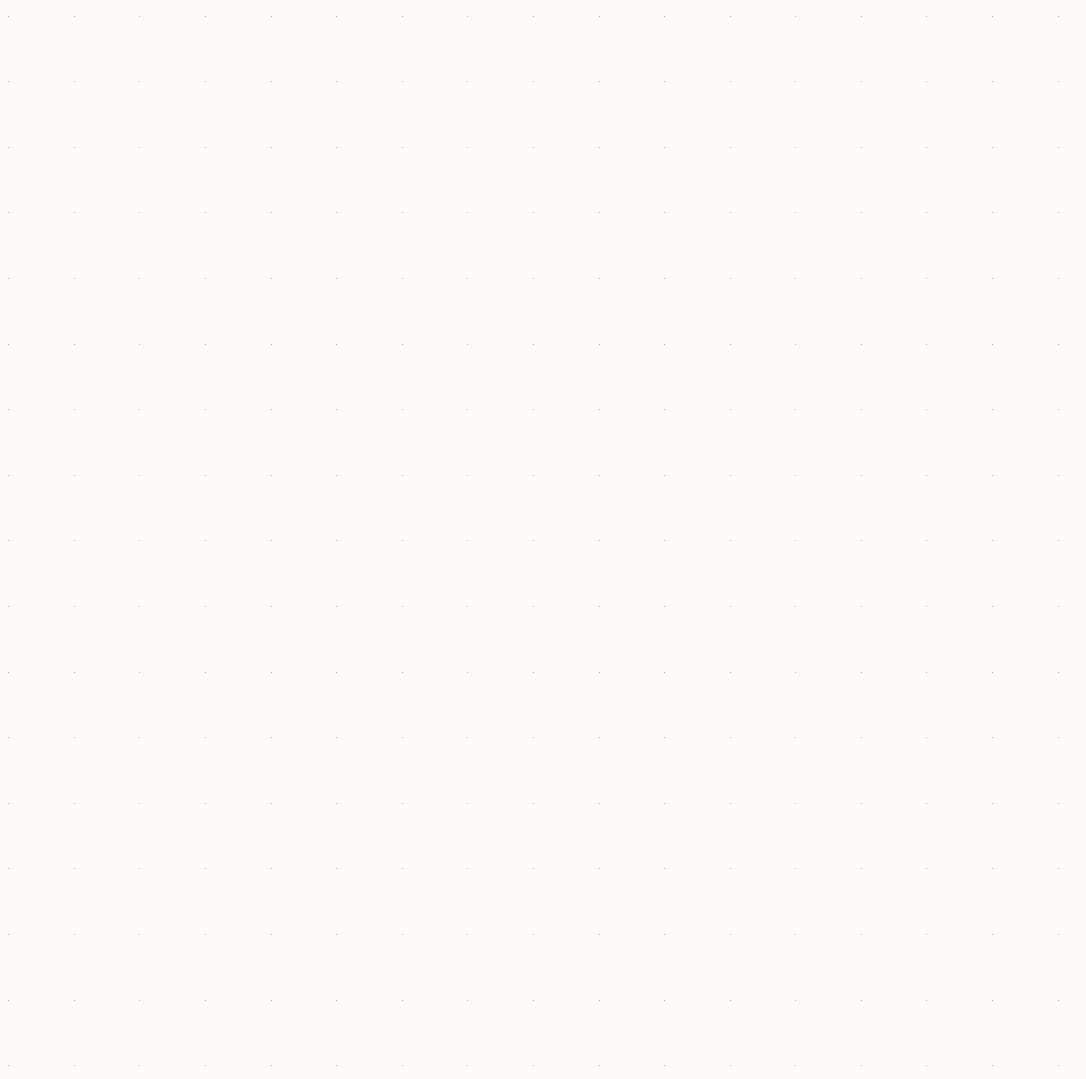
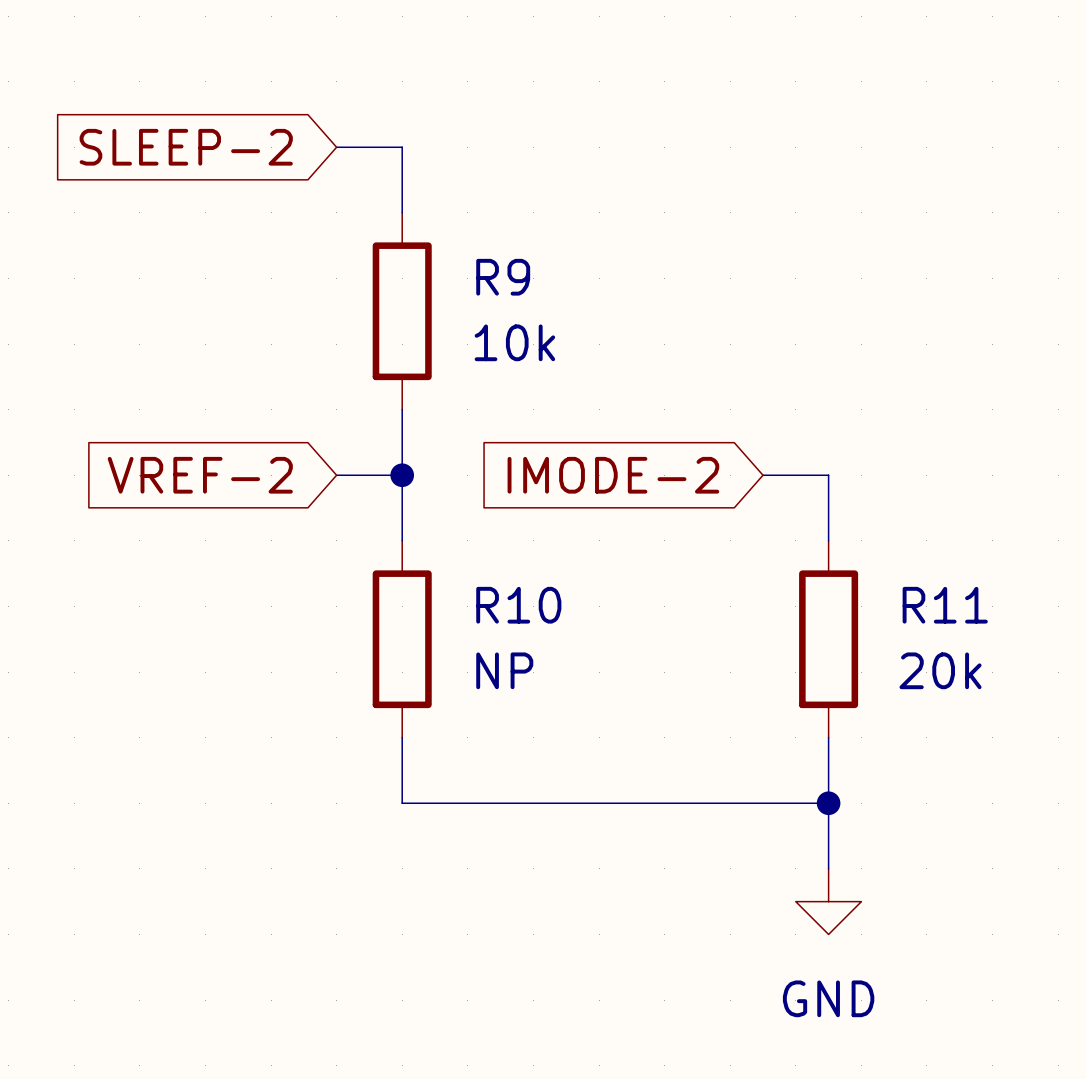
global label: none -> SLEEP-2 (186, 147)
wire: none -> (336, 147) (402, 147) (402, 212)
R9: none -> 10k (402, 311)
wire: none -> (402, 409) (402, 540)
global label: none -> VREF-2 (200, 475)
wire: none -> (336, 475) (402, 475)
junction: none -> (402, 475)
global label: none -> IMODE-2 (613, 475)
wire: none -> (763, 475) (828, 475) (828, 540)
R10: none -> NP (402, 639)
R11: none -> 20k (828, 639)
wire: none -> (402, 737) (402, 803) (828, 803)
wire: none -> (828, 737) (828, 868)
junction: none -> (828, 803)
power symbol: none -> GND (828, 901)

